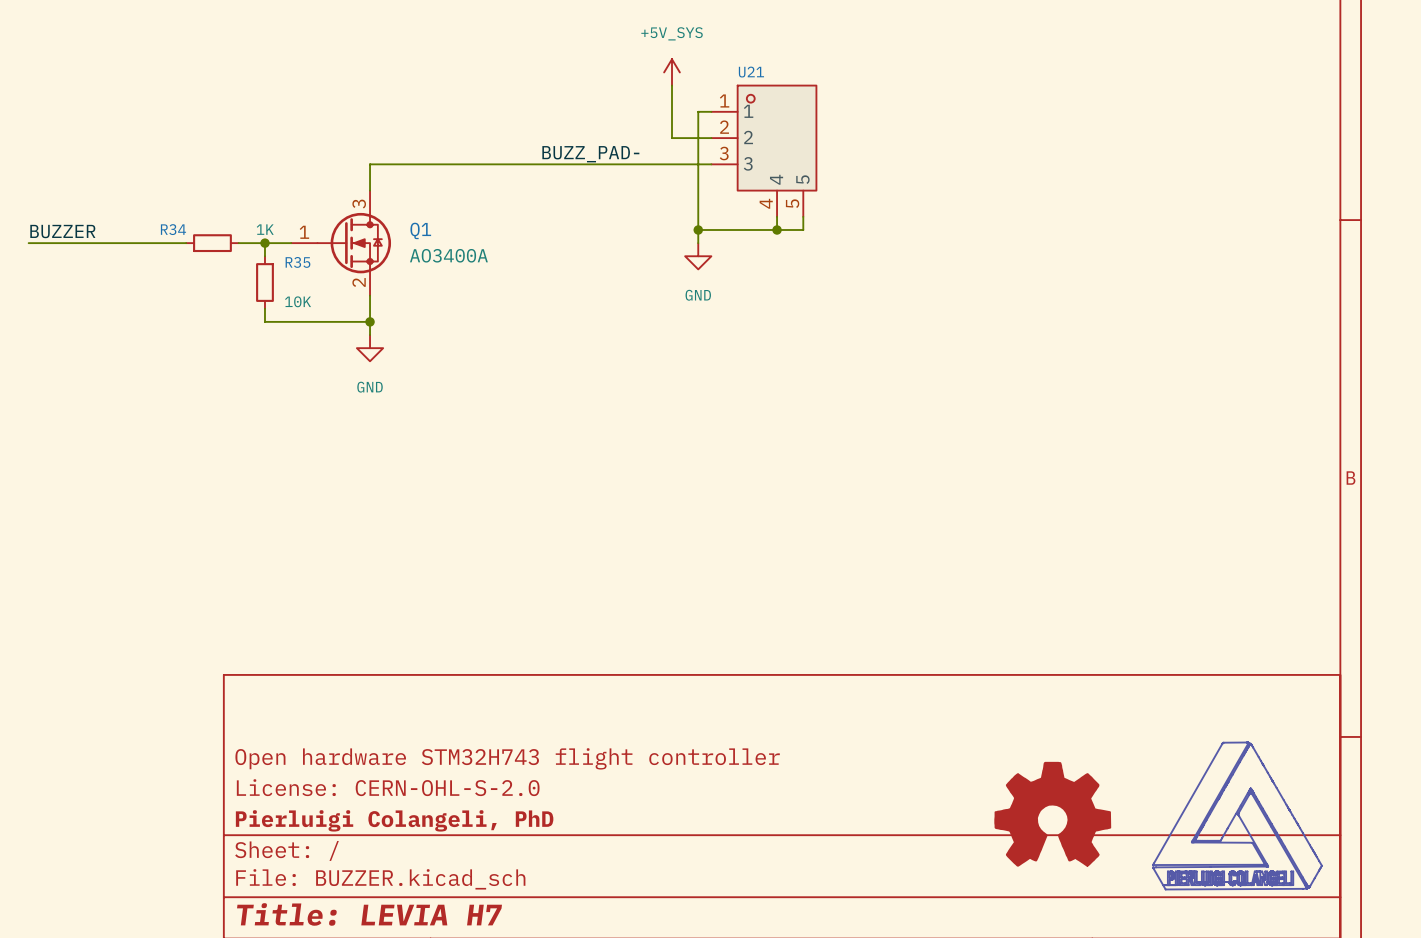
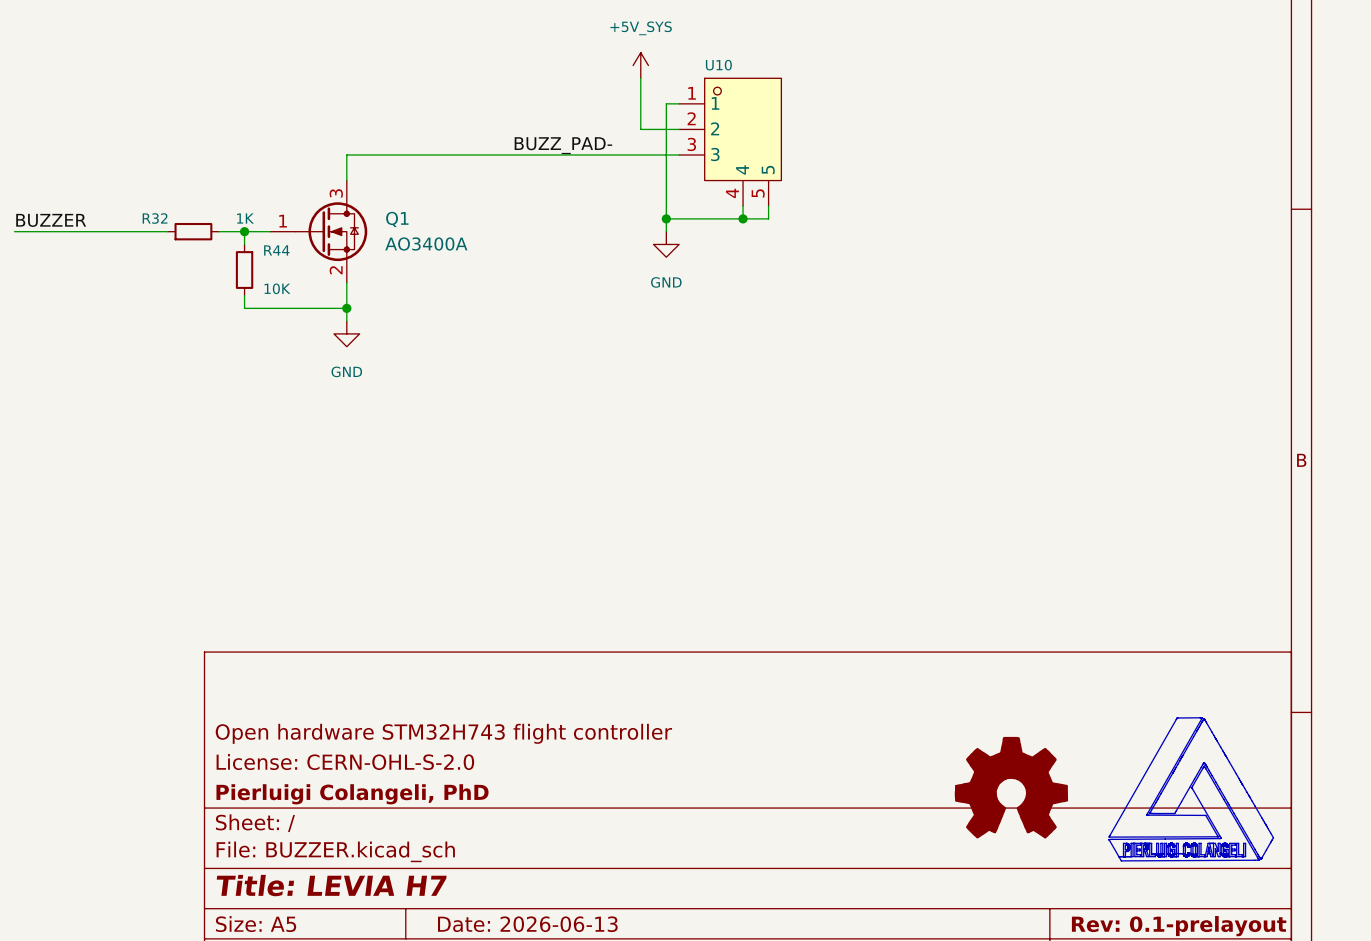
U21 name: U21 (751, 72) -> U10 (718, 65)
R34 name: R34 (173, 229) -> R32 (155, 218)
R35 name: R35 (297, 262) -> R44 (276, 250)

